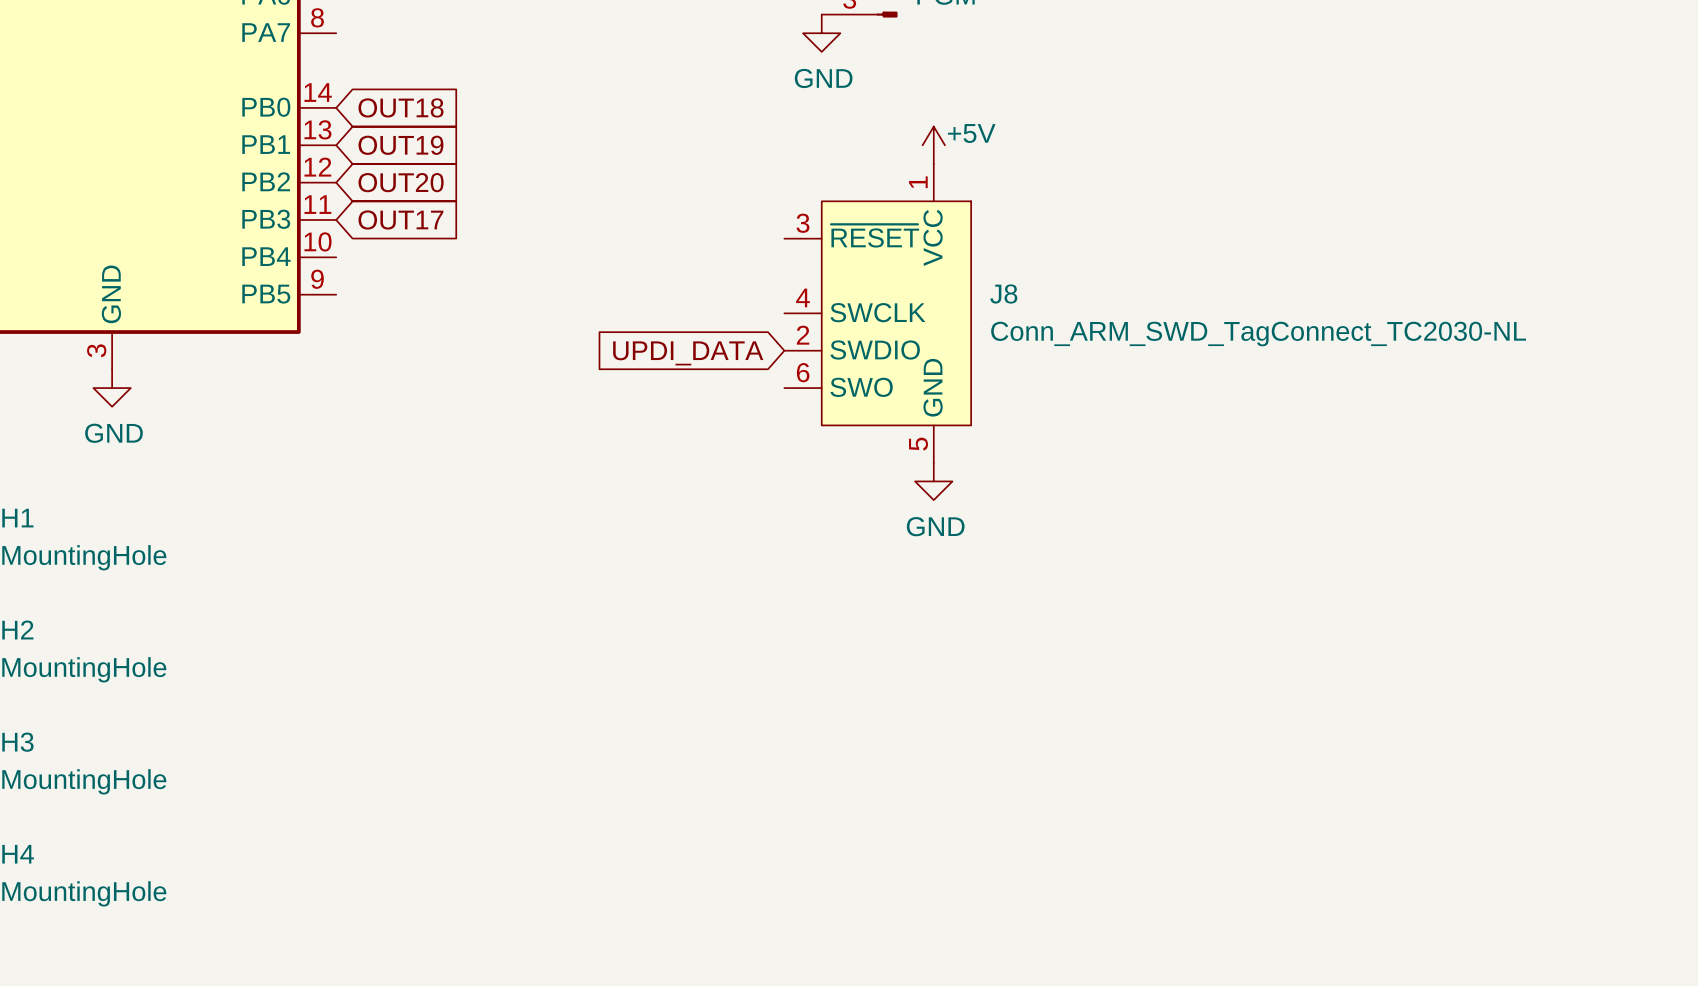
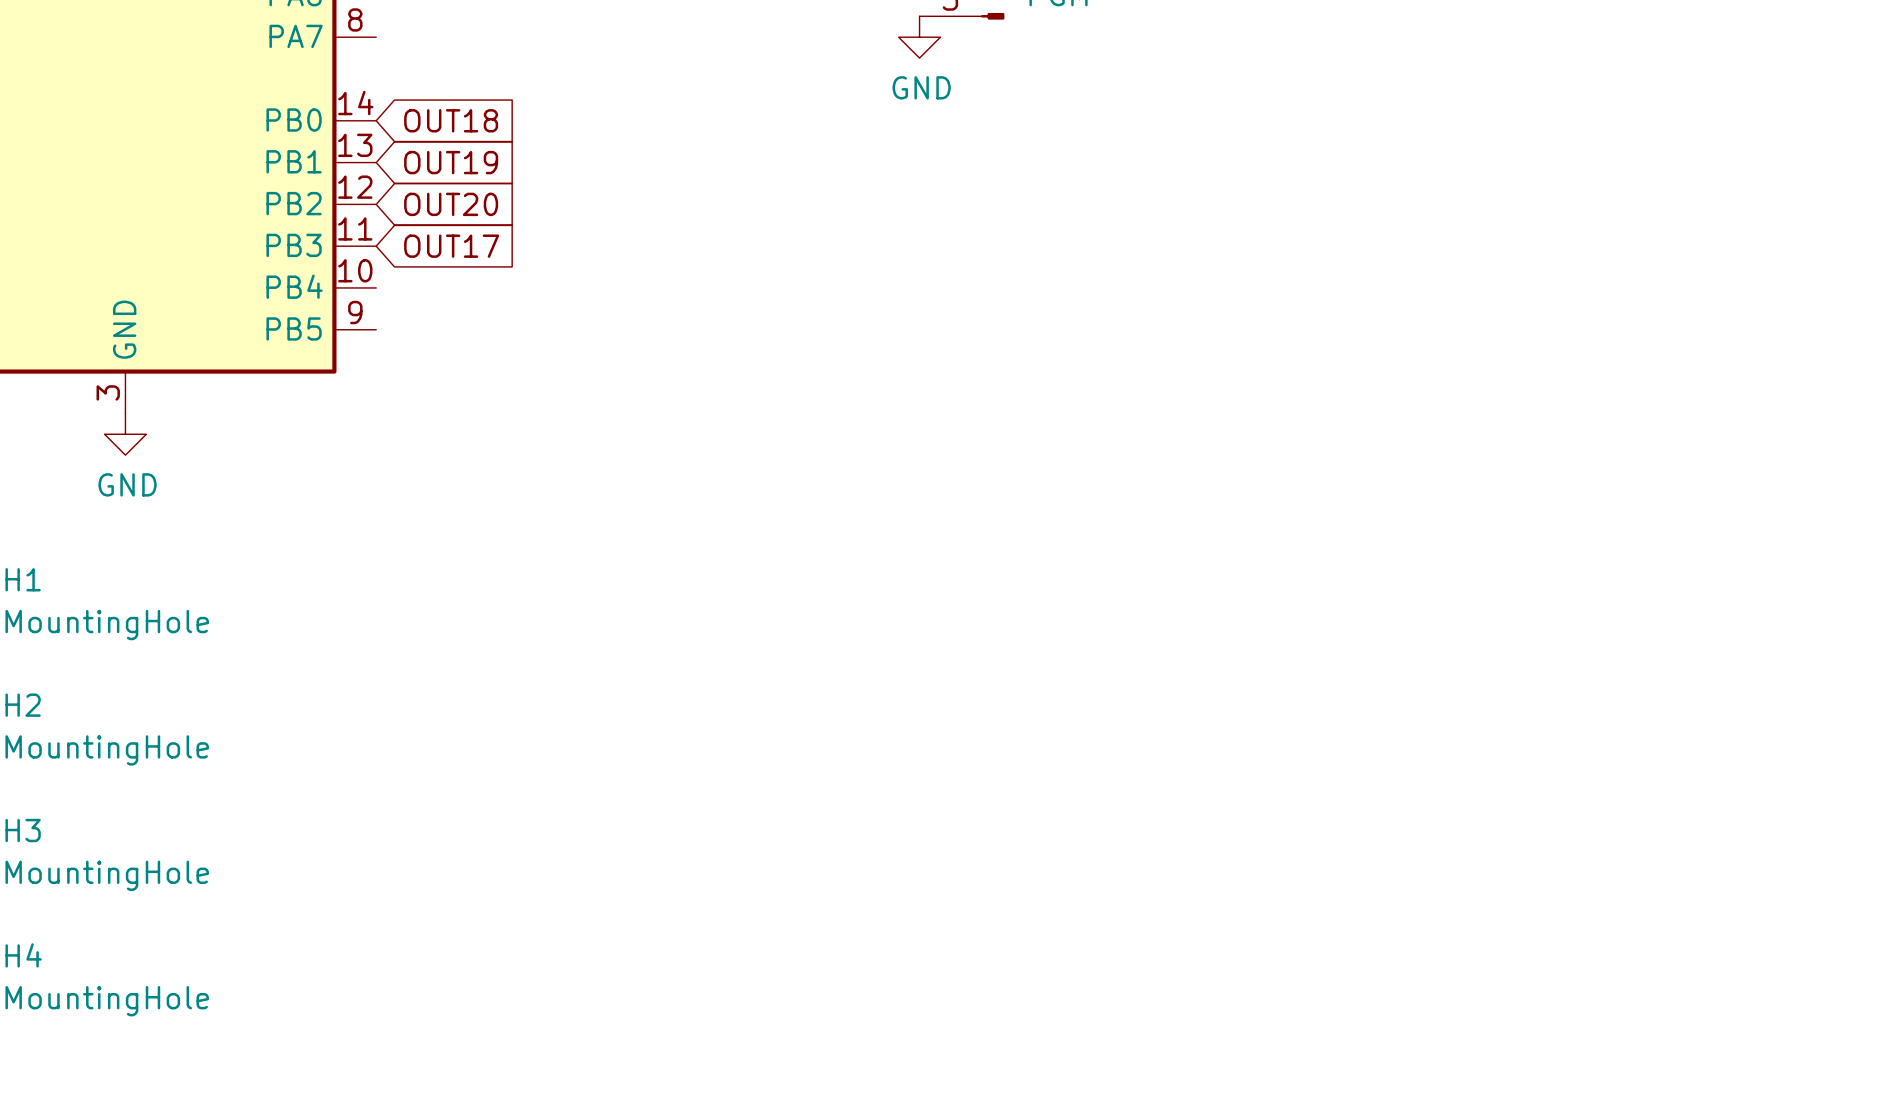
power symbol: +5V (933, 145) -> none
J8: Conn_ARM_SWD_TagConnect_TC2030-NL (877, 313) -> none
global label: UPDI_DATA (688, 353) -> none
power symbol: GND (933, 481) -> none

